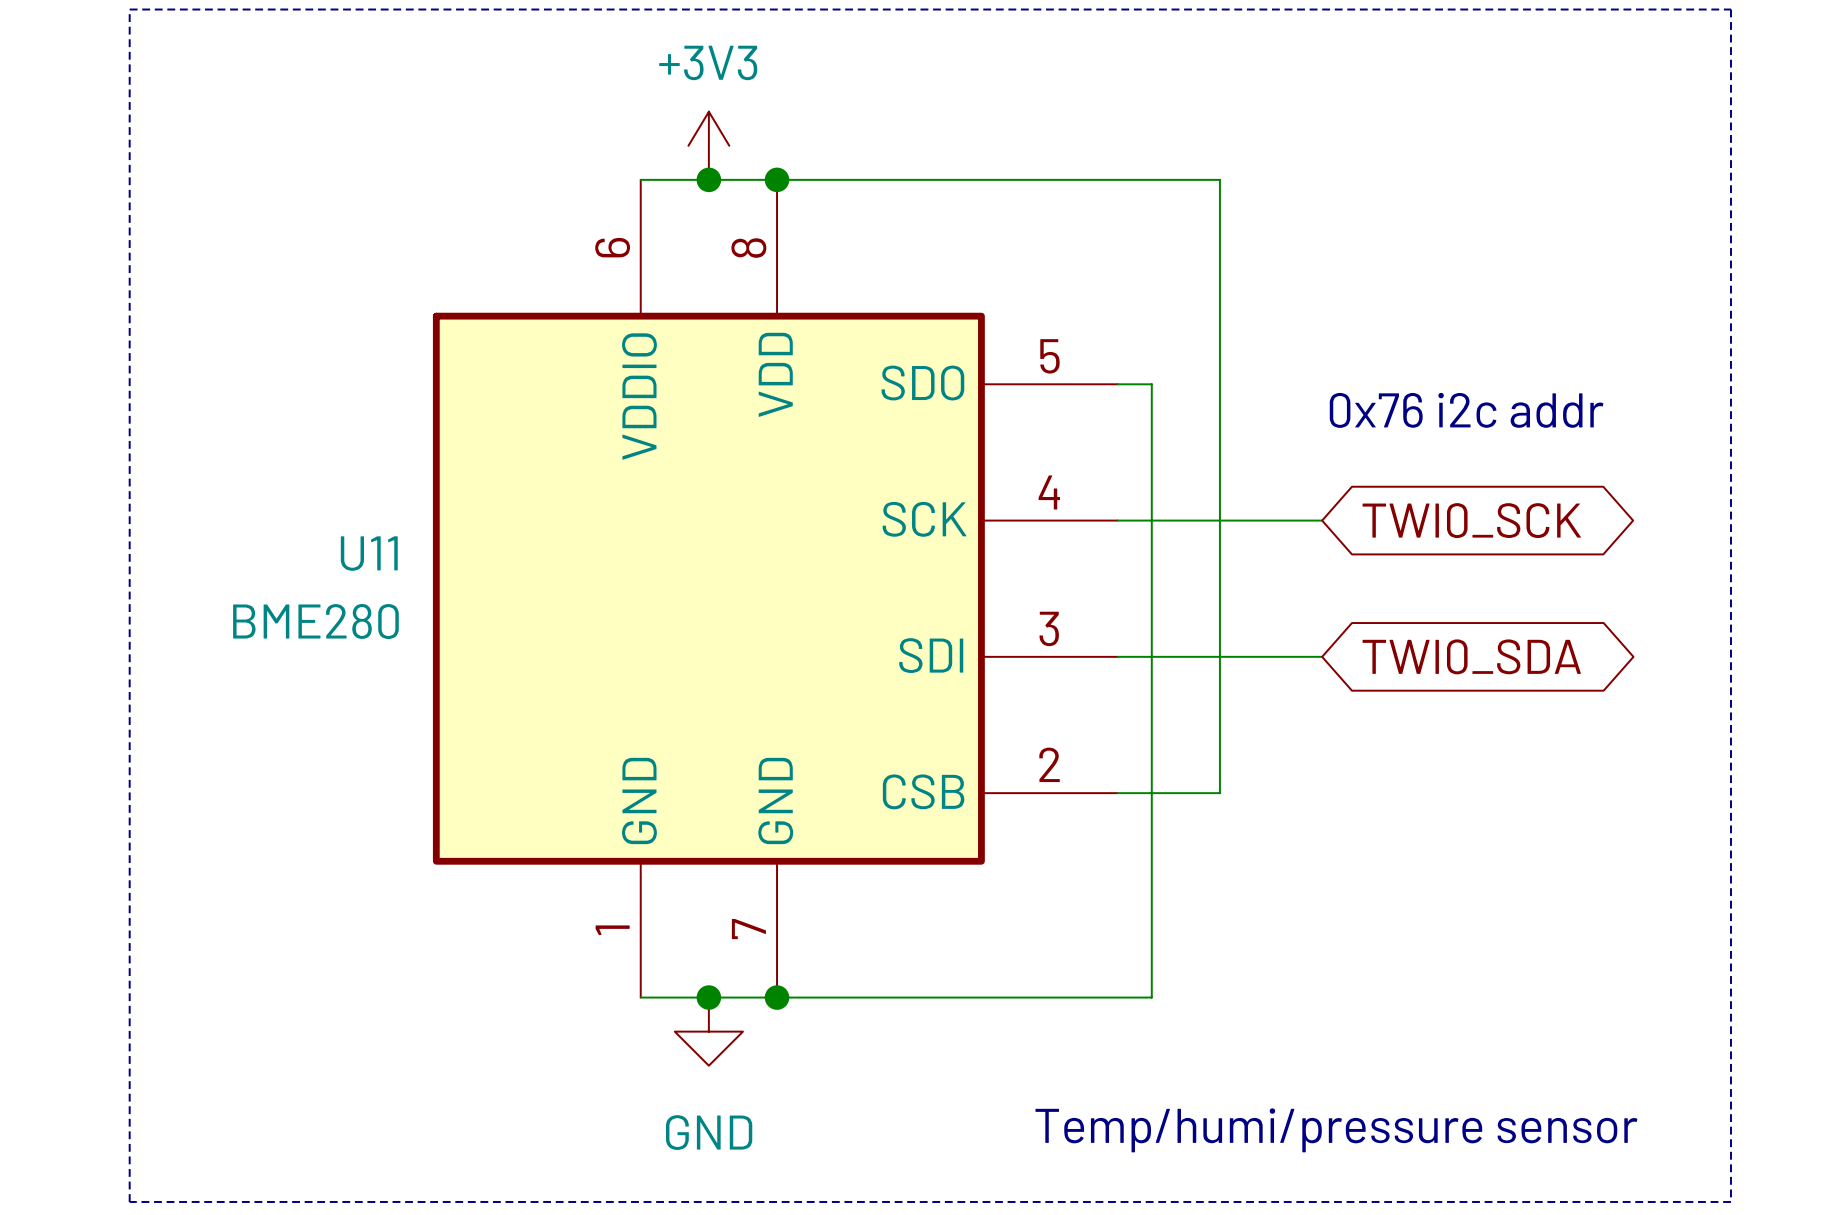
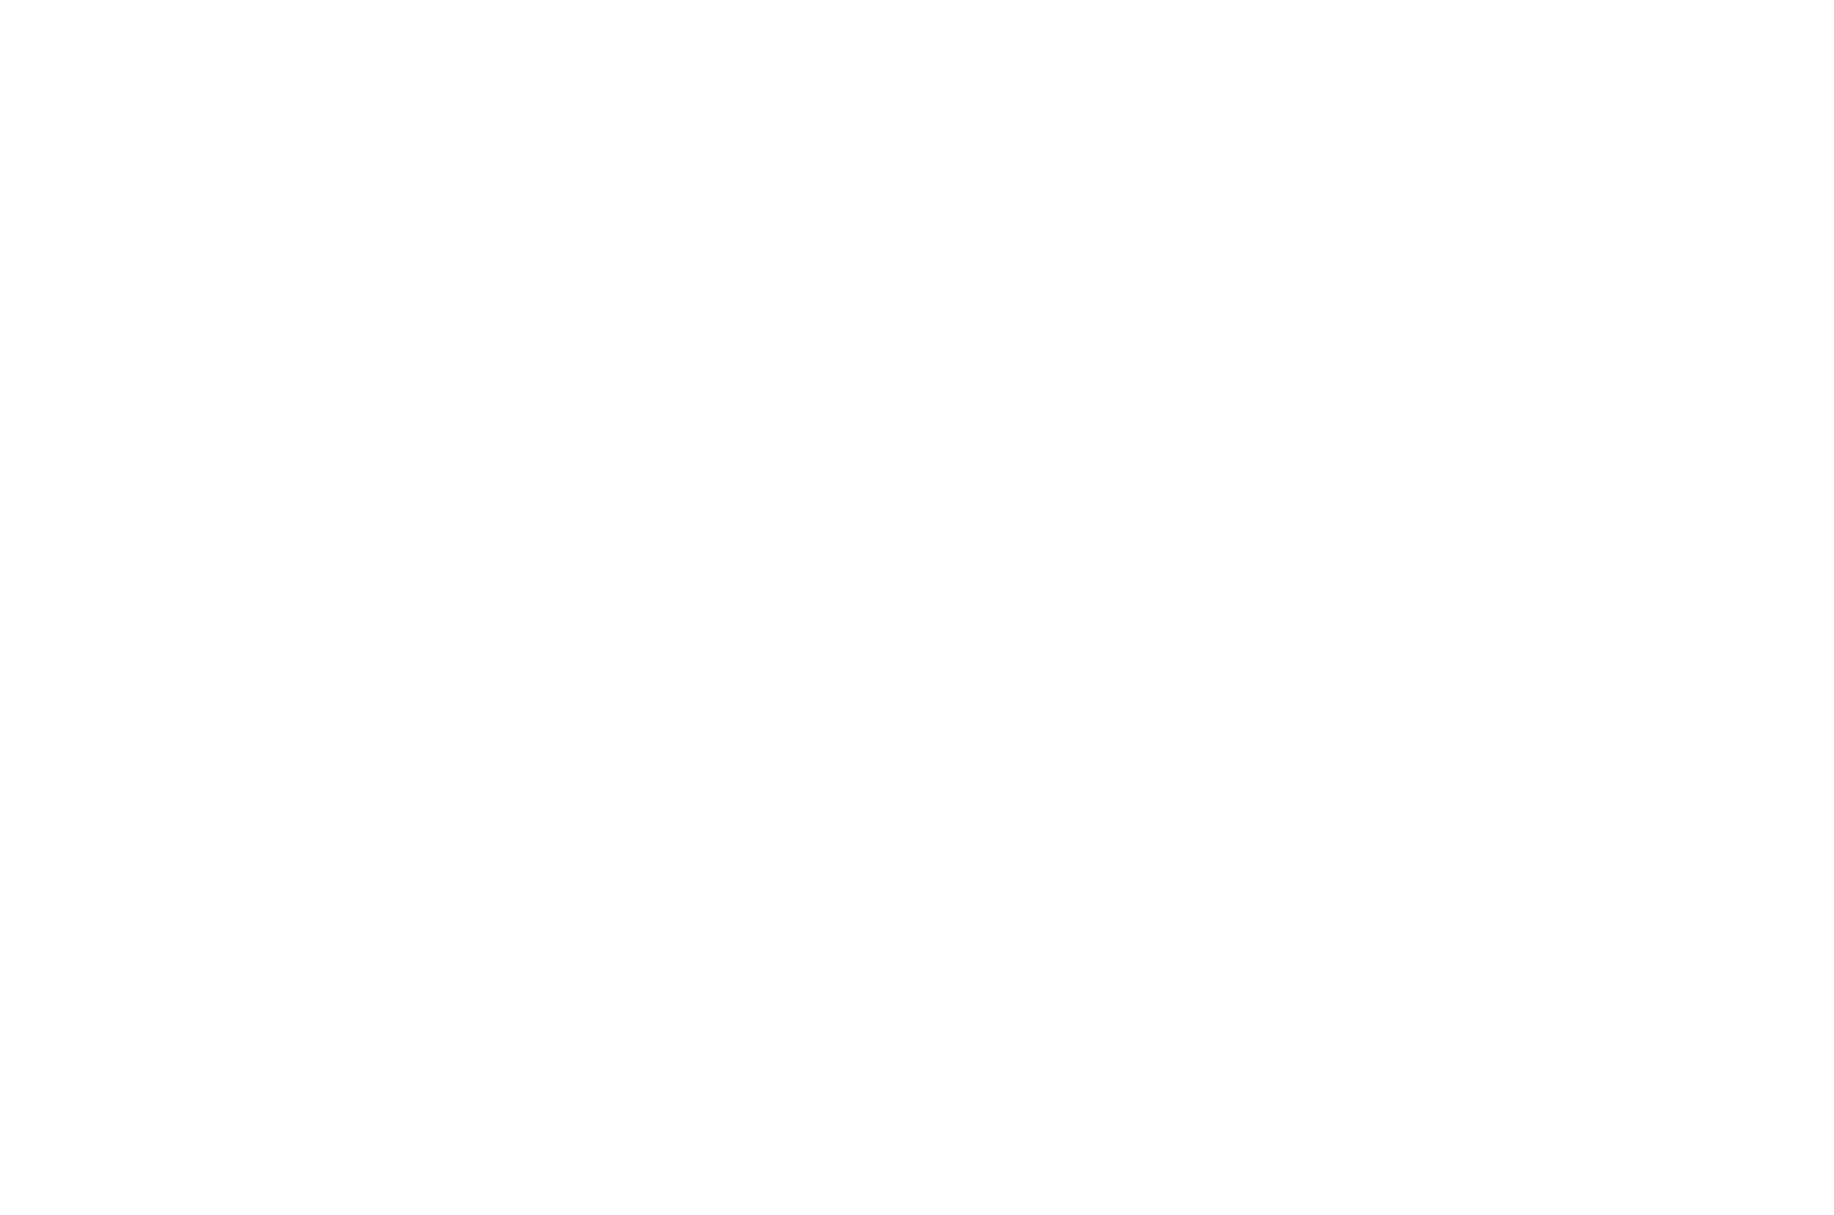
line: (129, 9) (1730, 9) (1730, 1201) (129, 1201) (129, 9) -> none
power symbol: +3V3 (708, 145) -> none
wire: (640, 179) (1219, 179) (1219, 793) (1117, 793) -> none
junction: (708, 179) -> none
junction: (777, 179) -> none
wire: (1117, 384) (1151, 384) (1151, 997) (640, 997) -> none
text: 0x76 i2c addr (1466, 410) -> none
wire: (1117, 520) (1322, 520) -> none
global label: TWI0_SCK (1471, 520) -> none
U11: BME280 (775, 588) -> none
wire: (1117, 656) (1322, 656) -> none
global label: TWI0_SDA (1471, 656) -> none
junction: (708, 997) -> none
junction: (777, 997) -> none
power symbol: GND (708, 1031) -> none
text: Temp/humi/pressure sensor (1336, 1130) -> none

